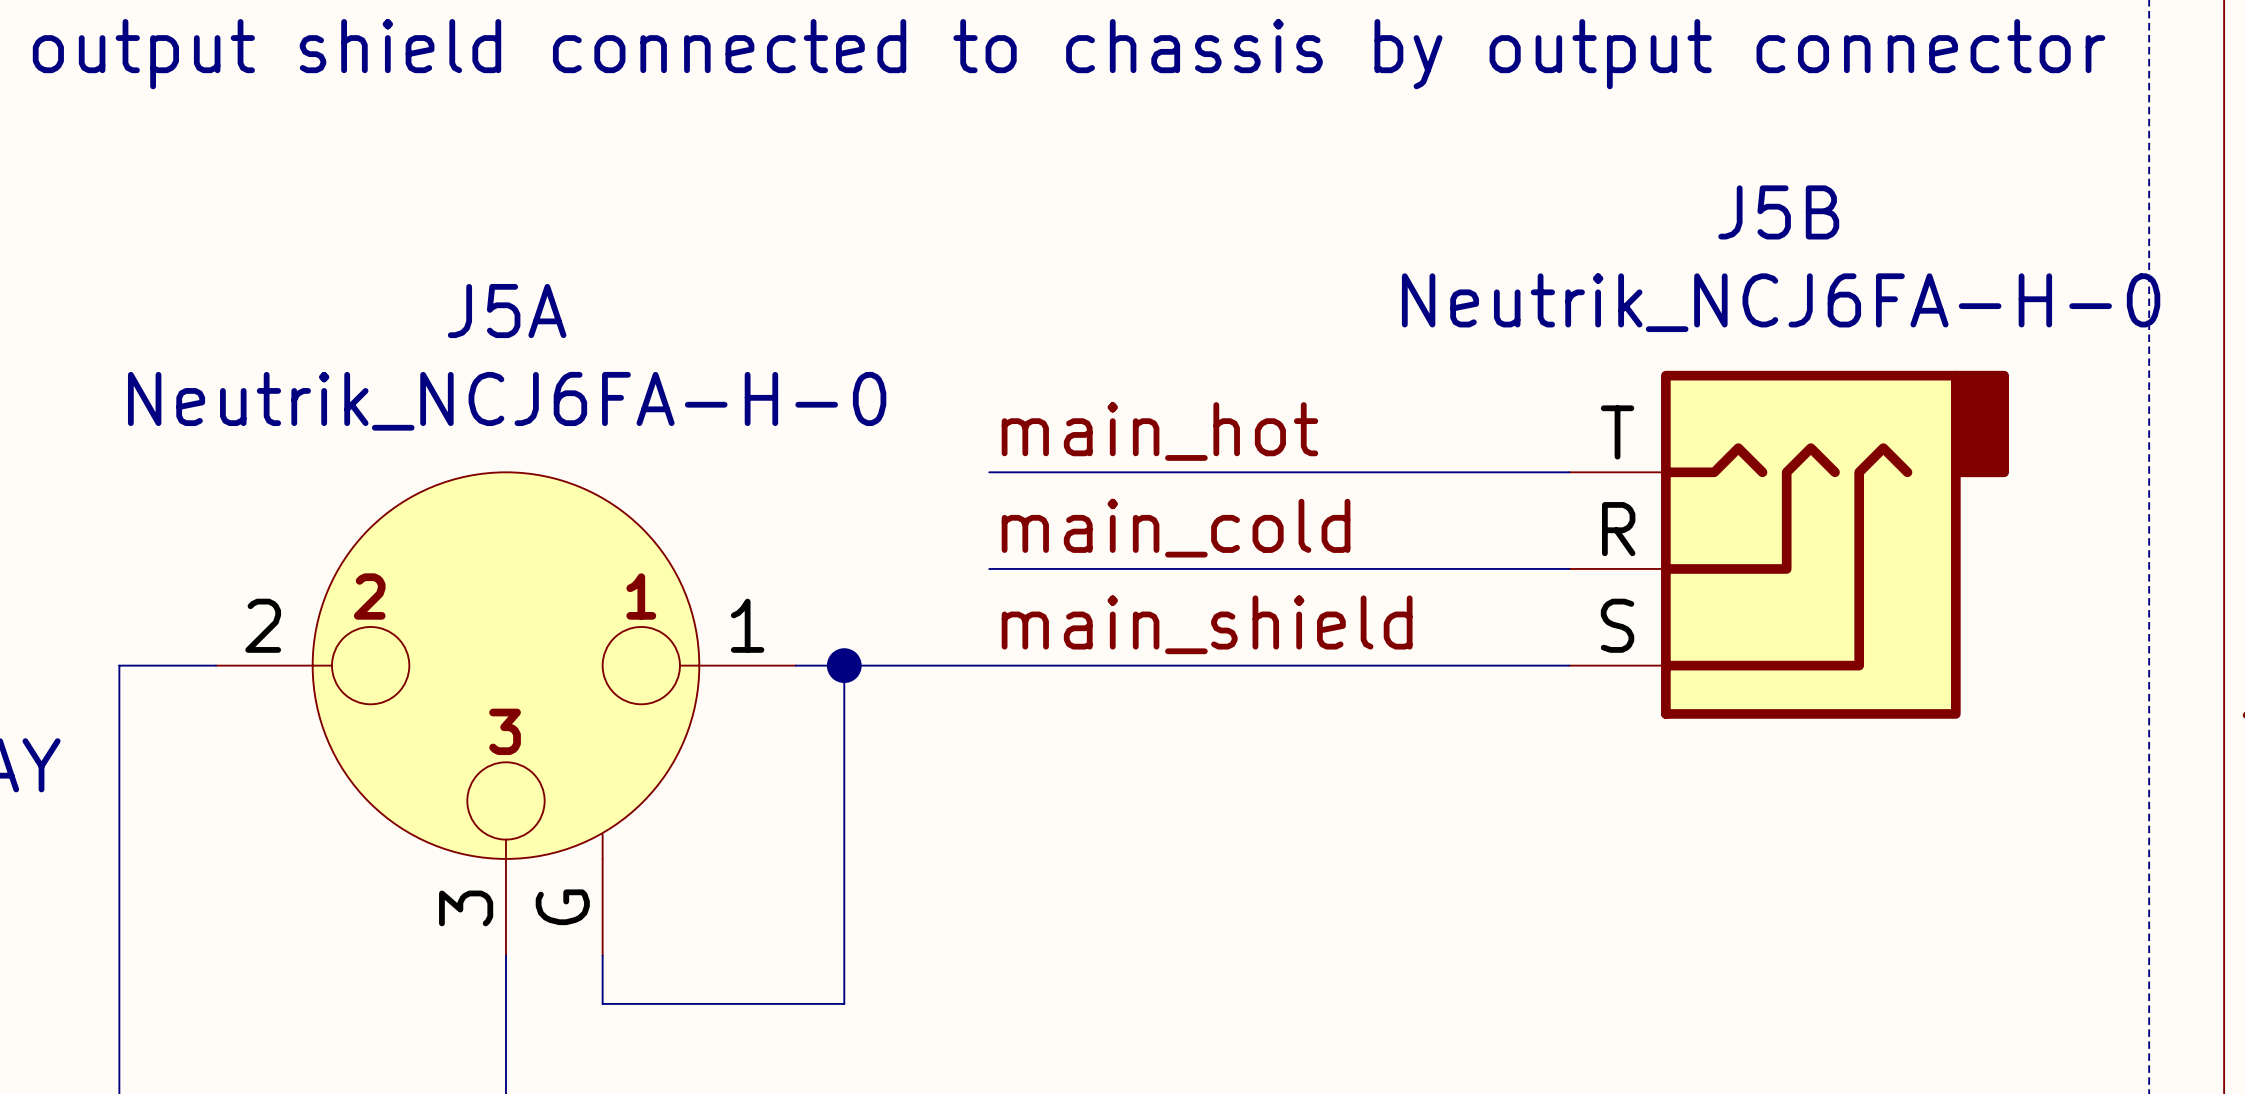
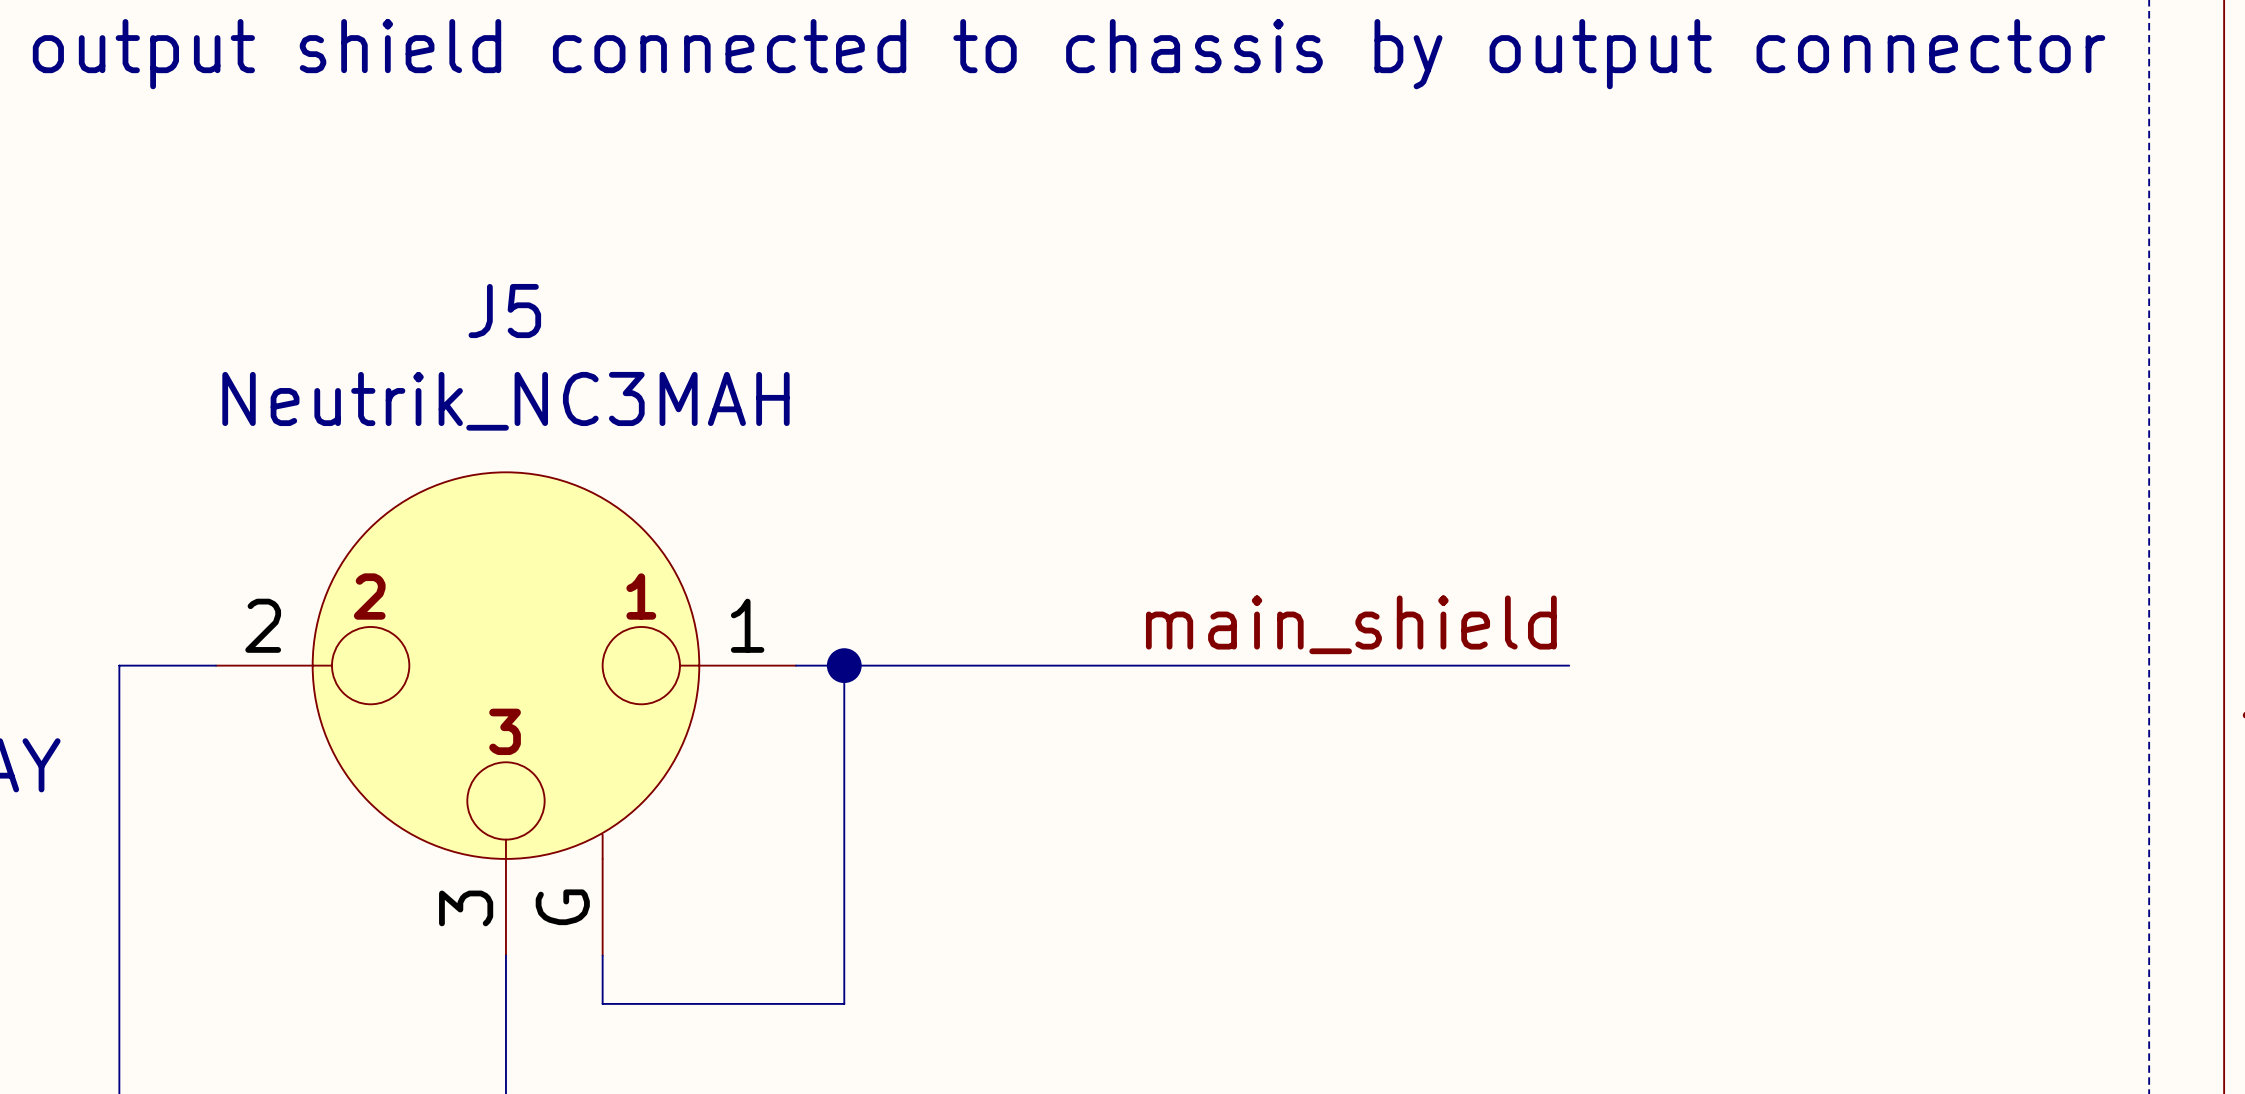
J5A name: J5A (507, 311) -> J5 (504, 311)
J5A value: Neutrik_NCJ6FA-H-0 (507, 401) -> Neutrik_NC3MAH (505, 401)
label: main_hot (1159, 431) -> none
wire: (989, 472) (1569, 472) -> none
label: main_cold (1176, 528) -> none
J5B: Neutrik_NCJ6FA-H-0 (1789, 544) -> none
wire: (989, 568) (1569, 568) -> none
label position: main_shield (1207, 624) -> main_shield (1351, 624)

